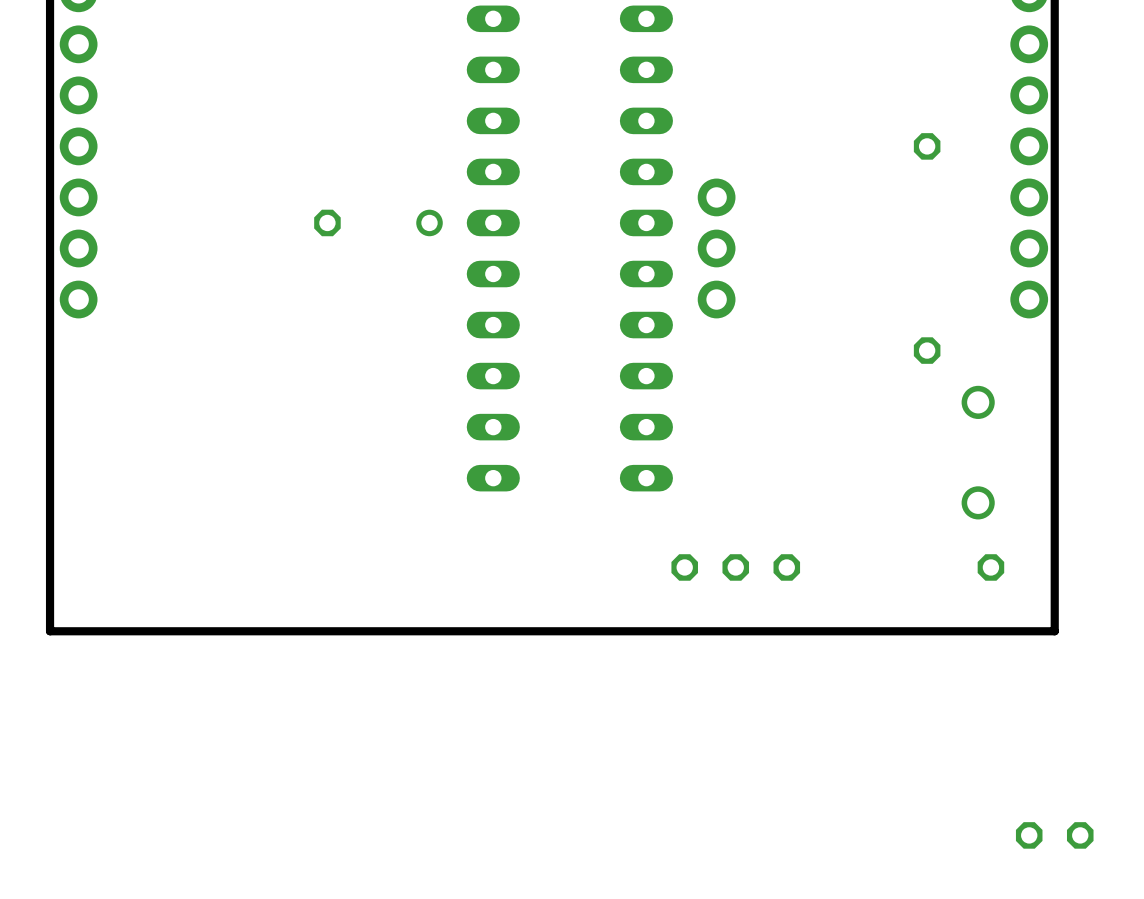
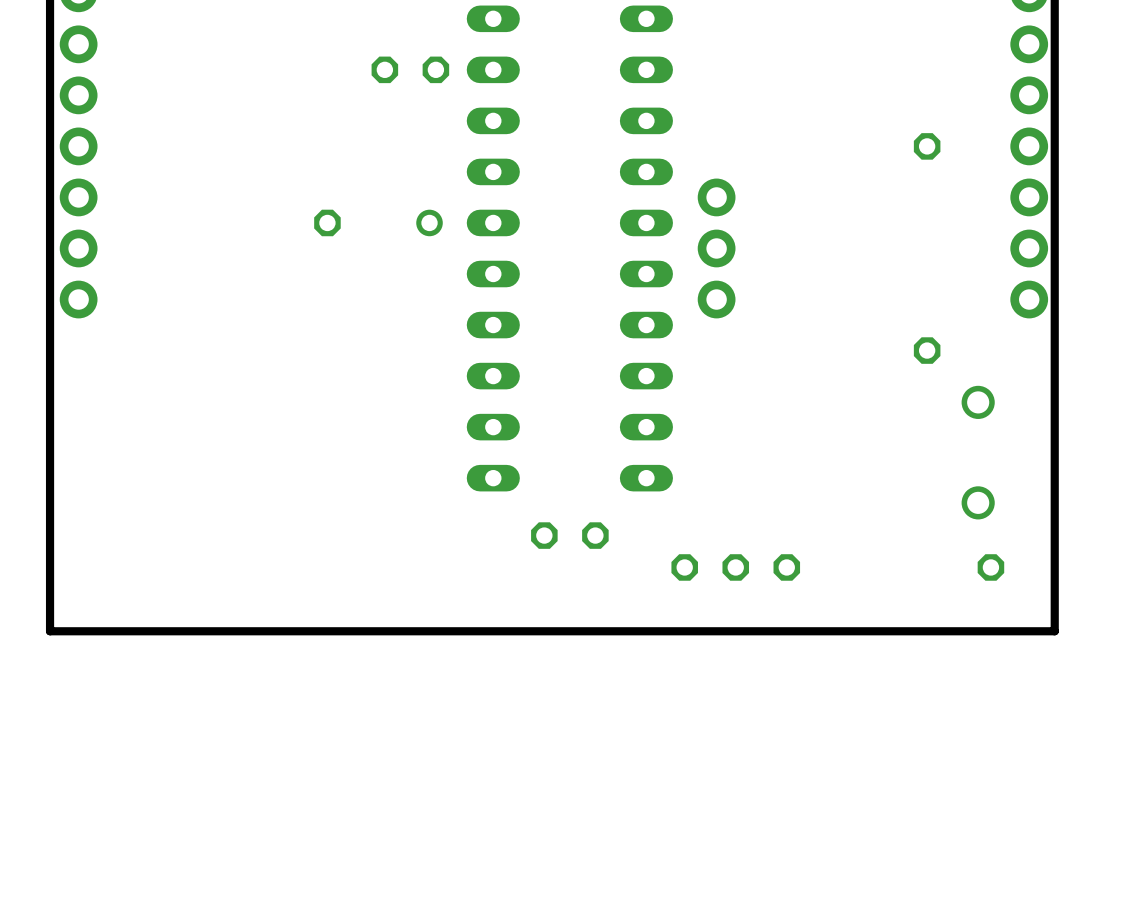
part: none -> (410, 69)
part: none -> (569, 535)
part: (1054, 835) -> none

